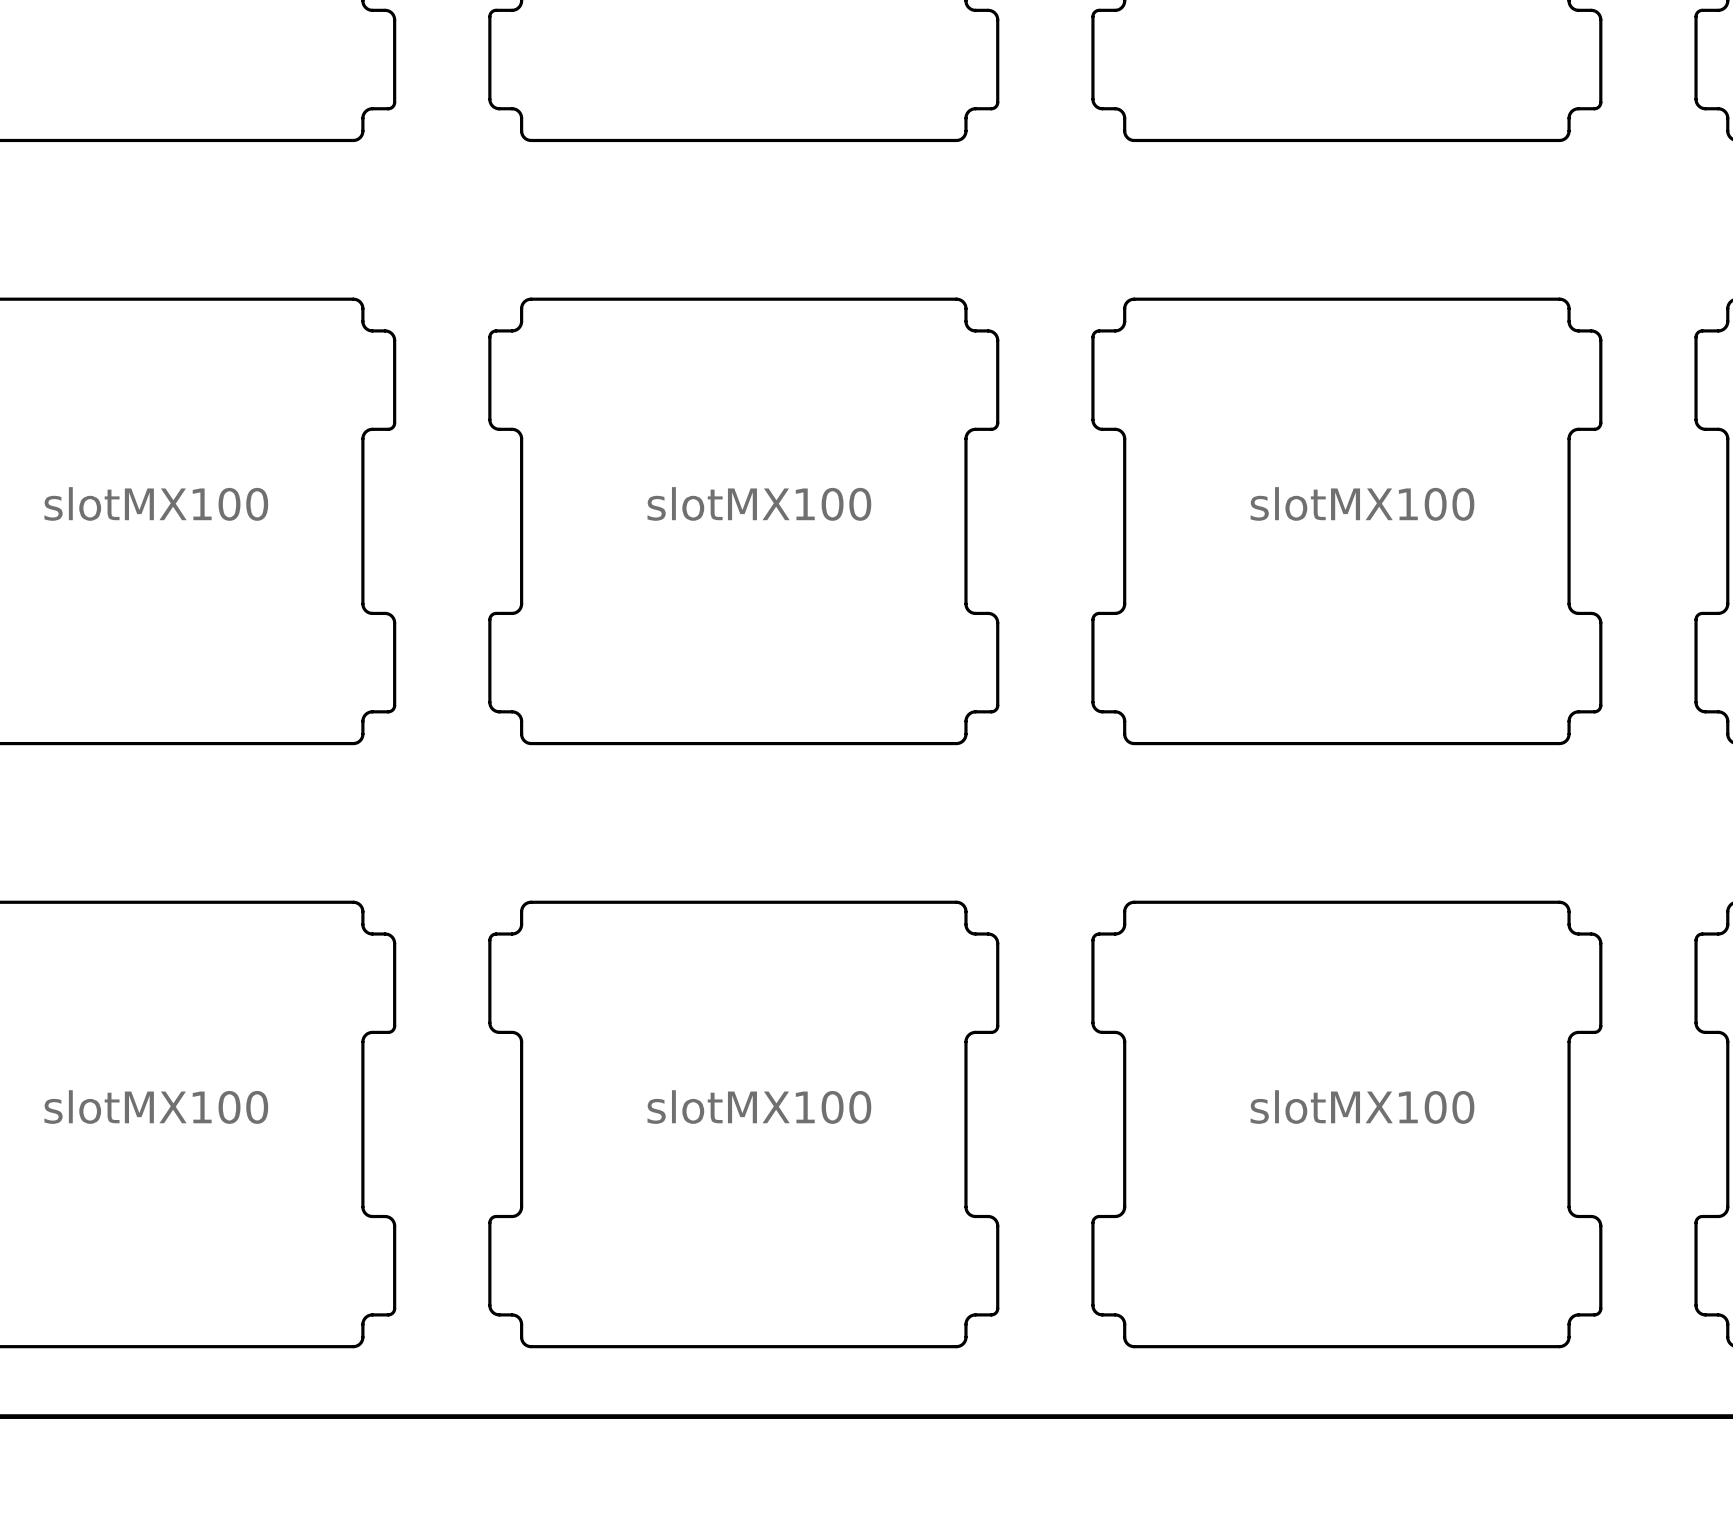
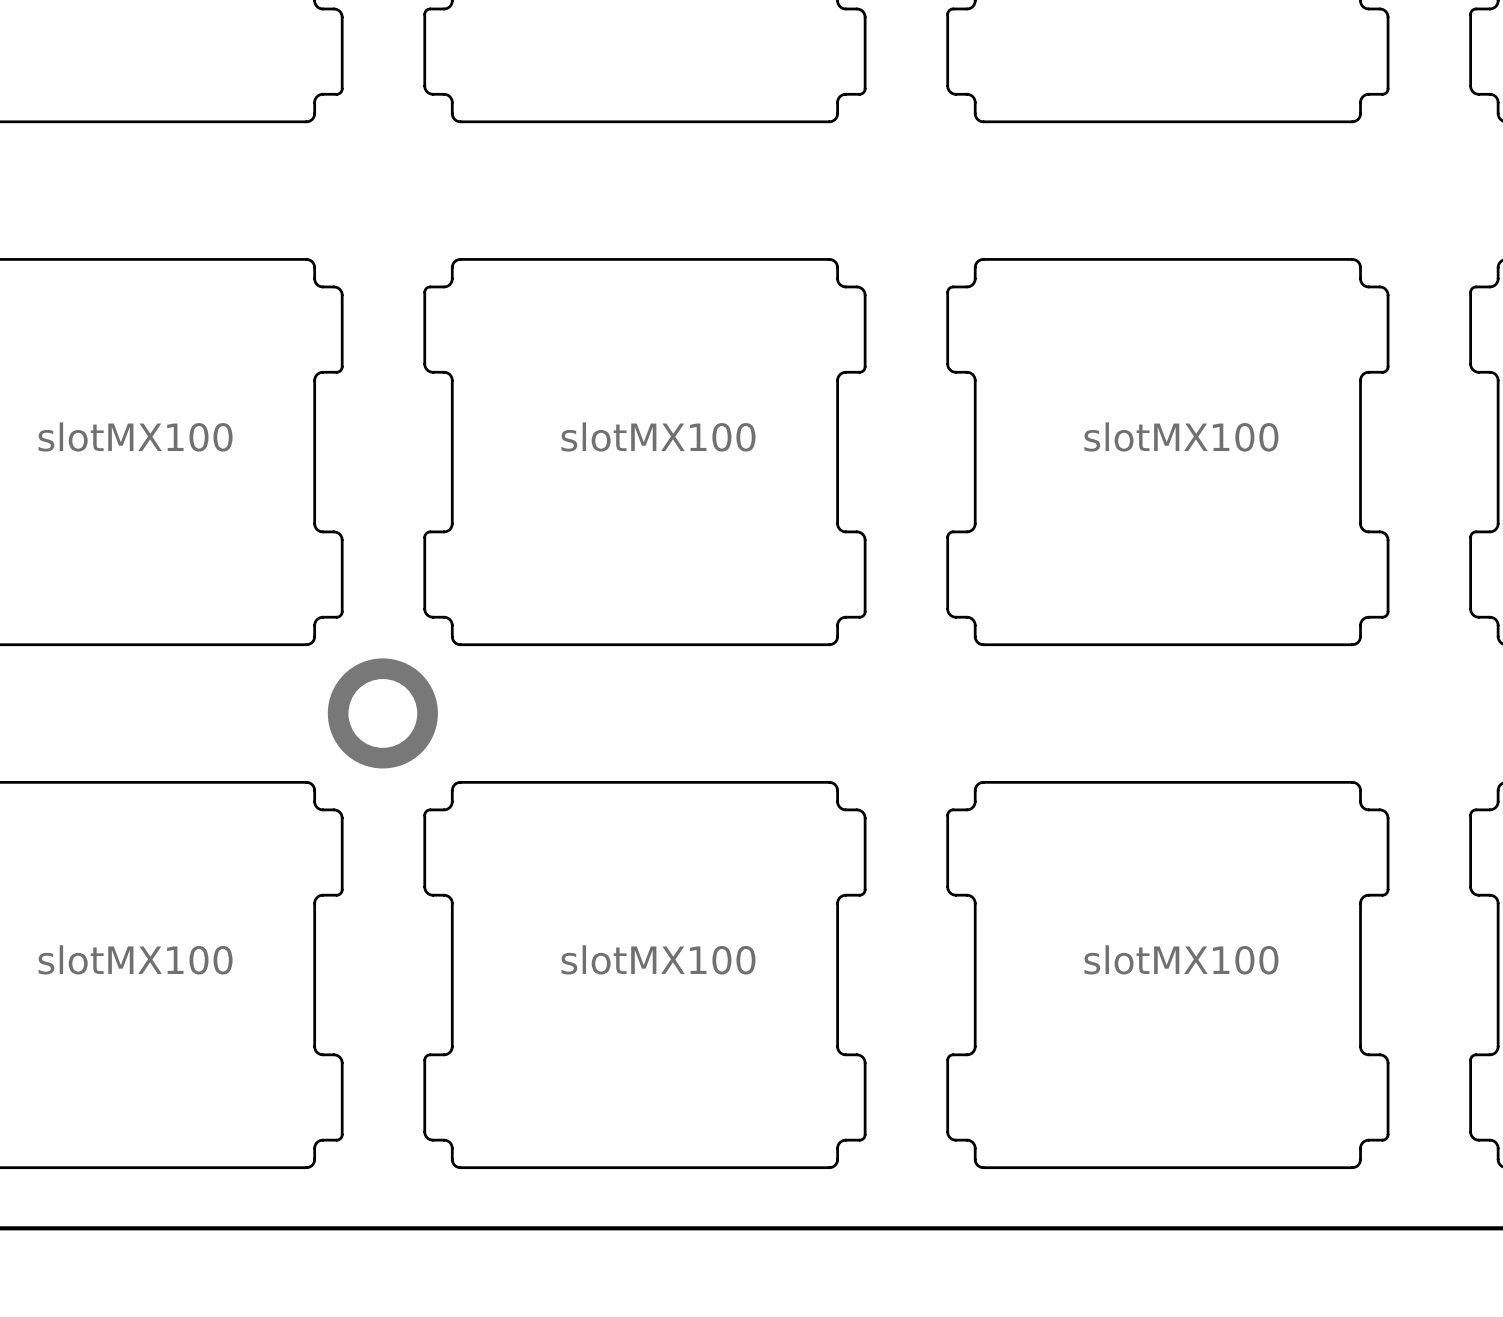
via: none -> (382, 713)

